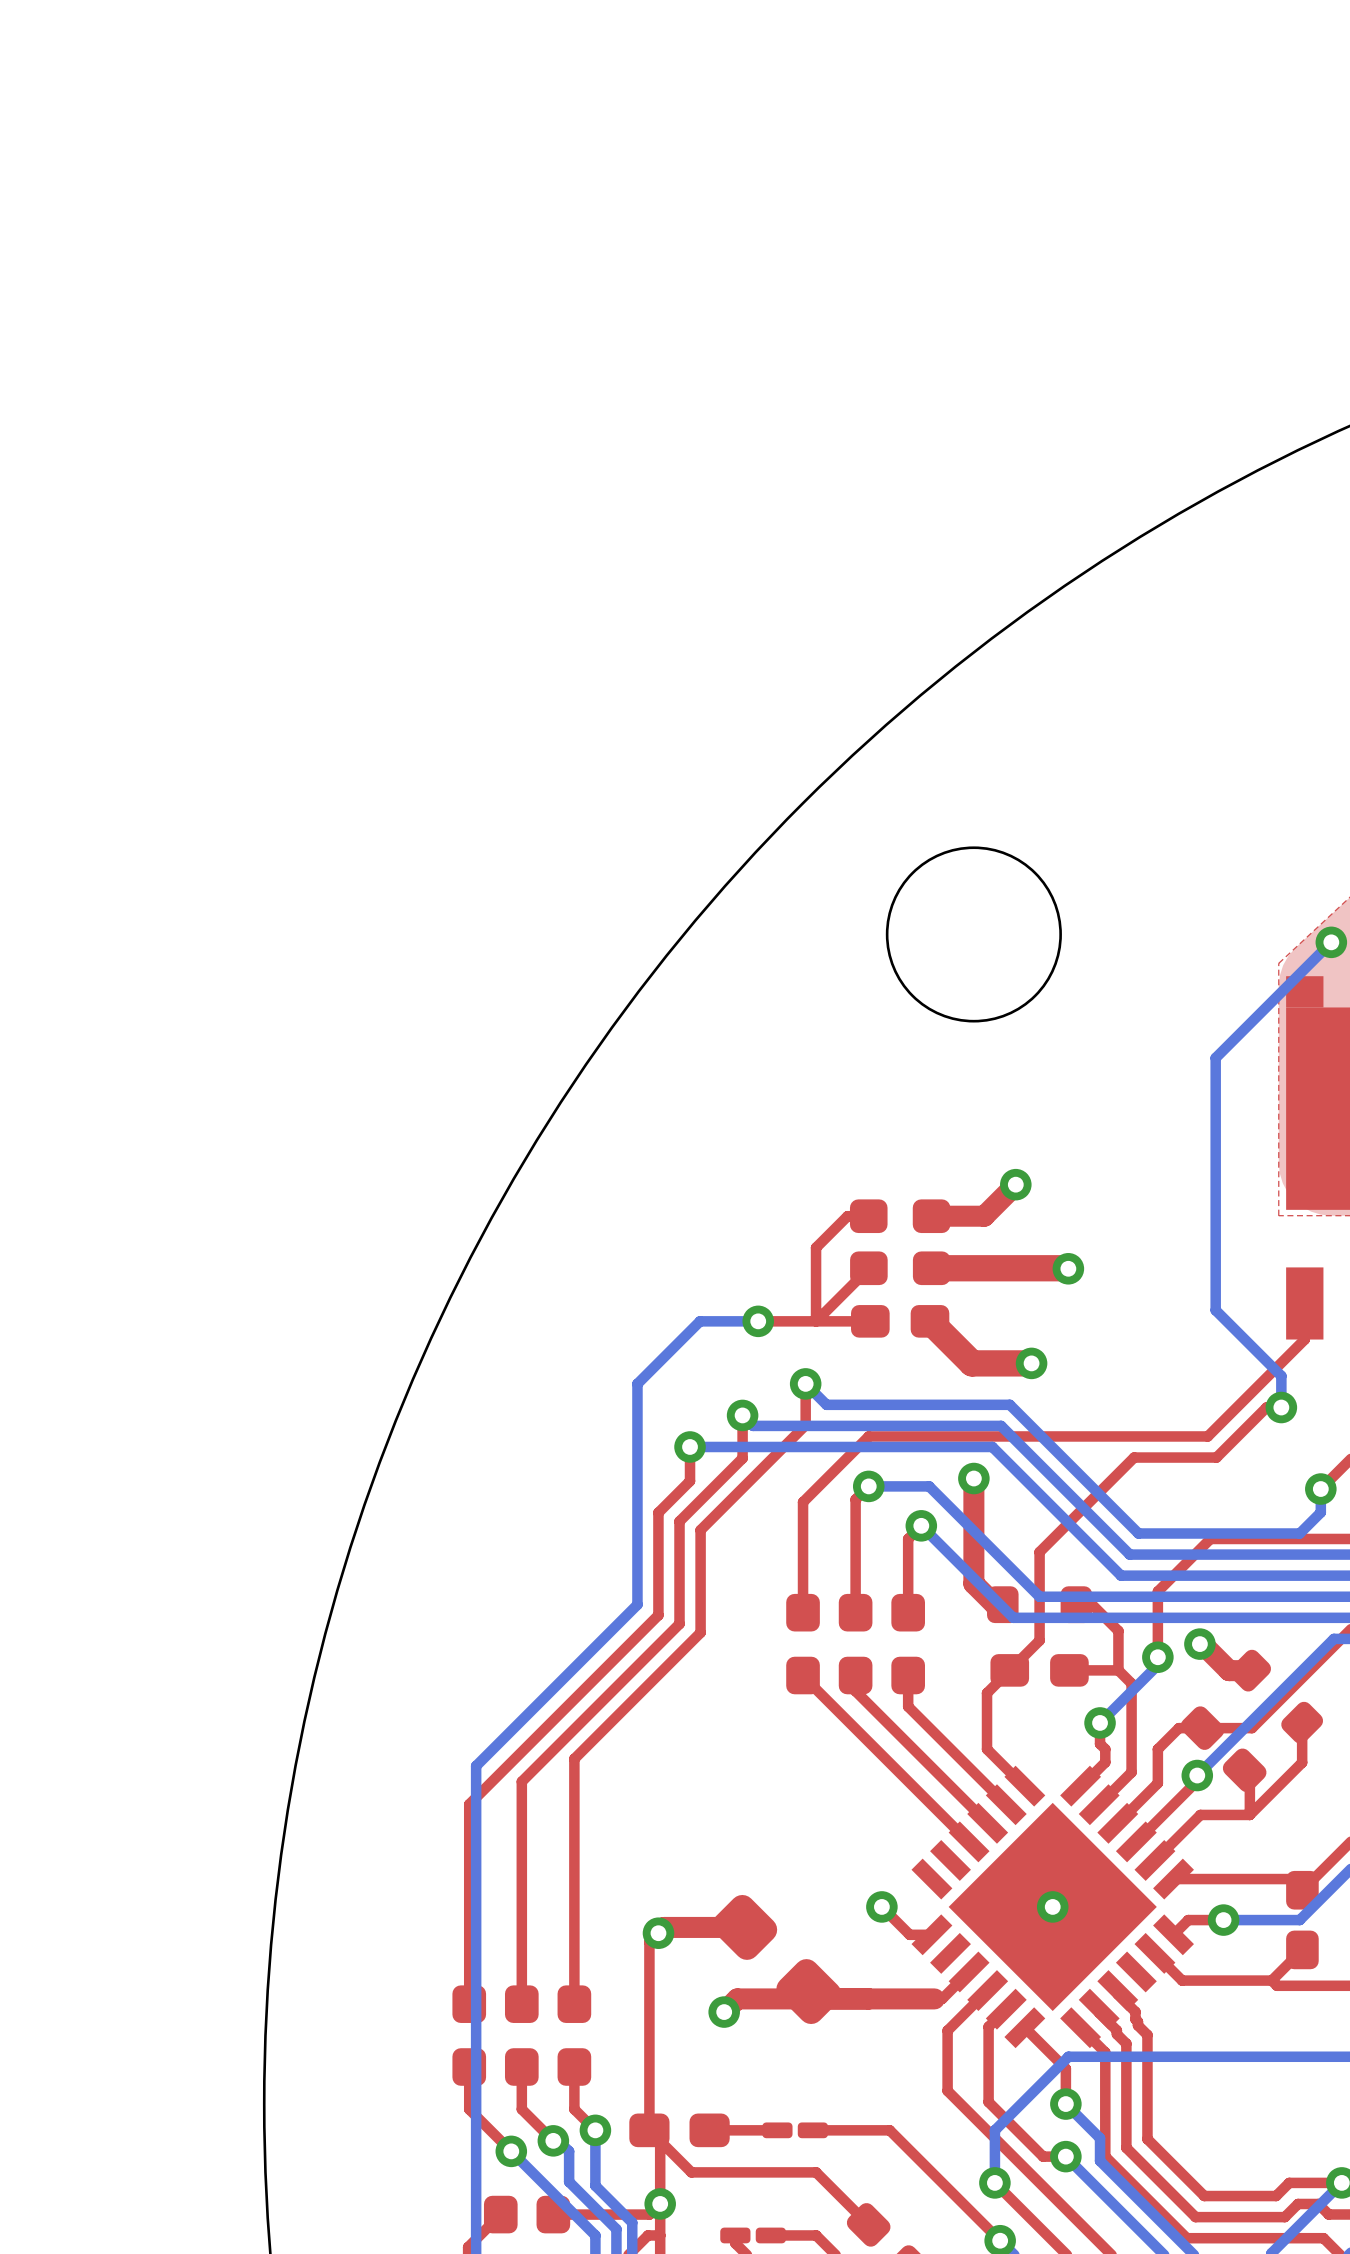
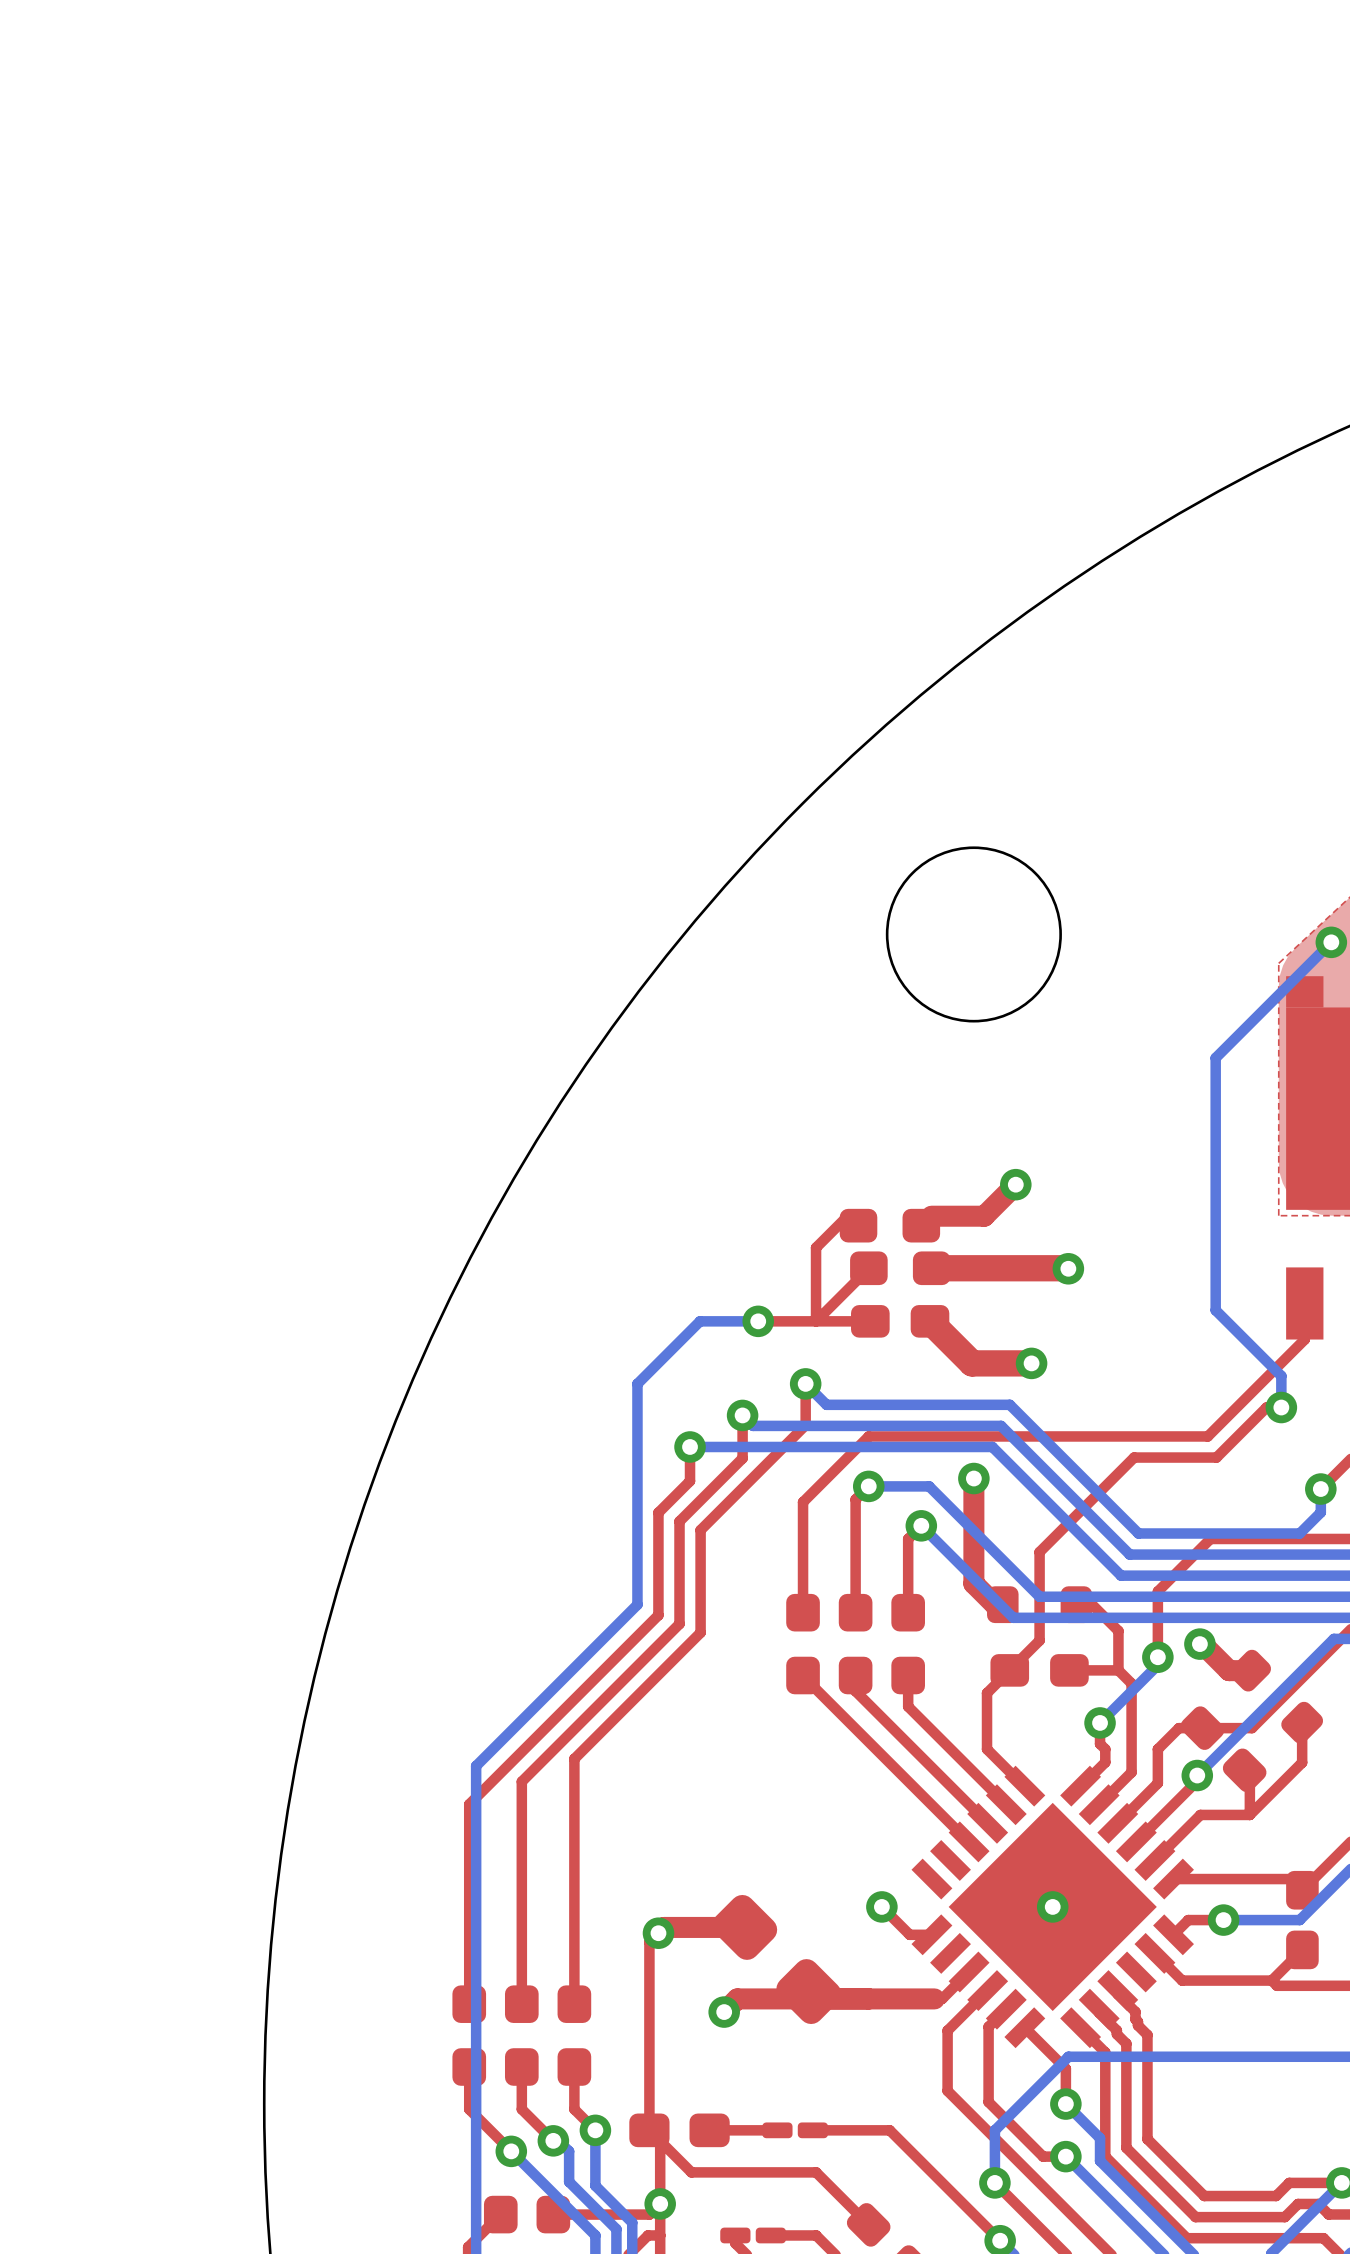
part position: (900, 1216) -> (889, 1225)

